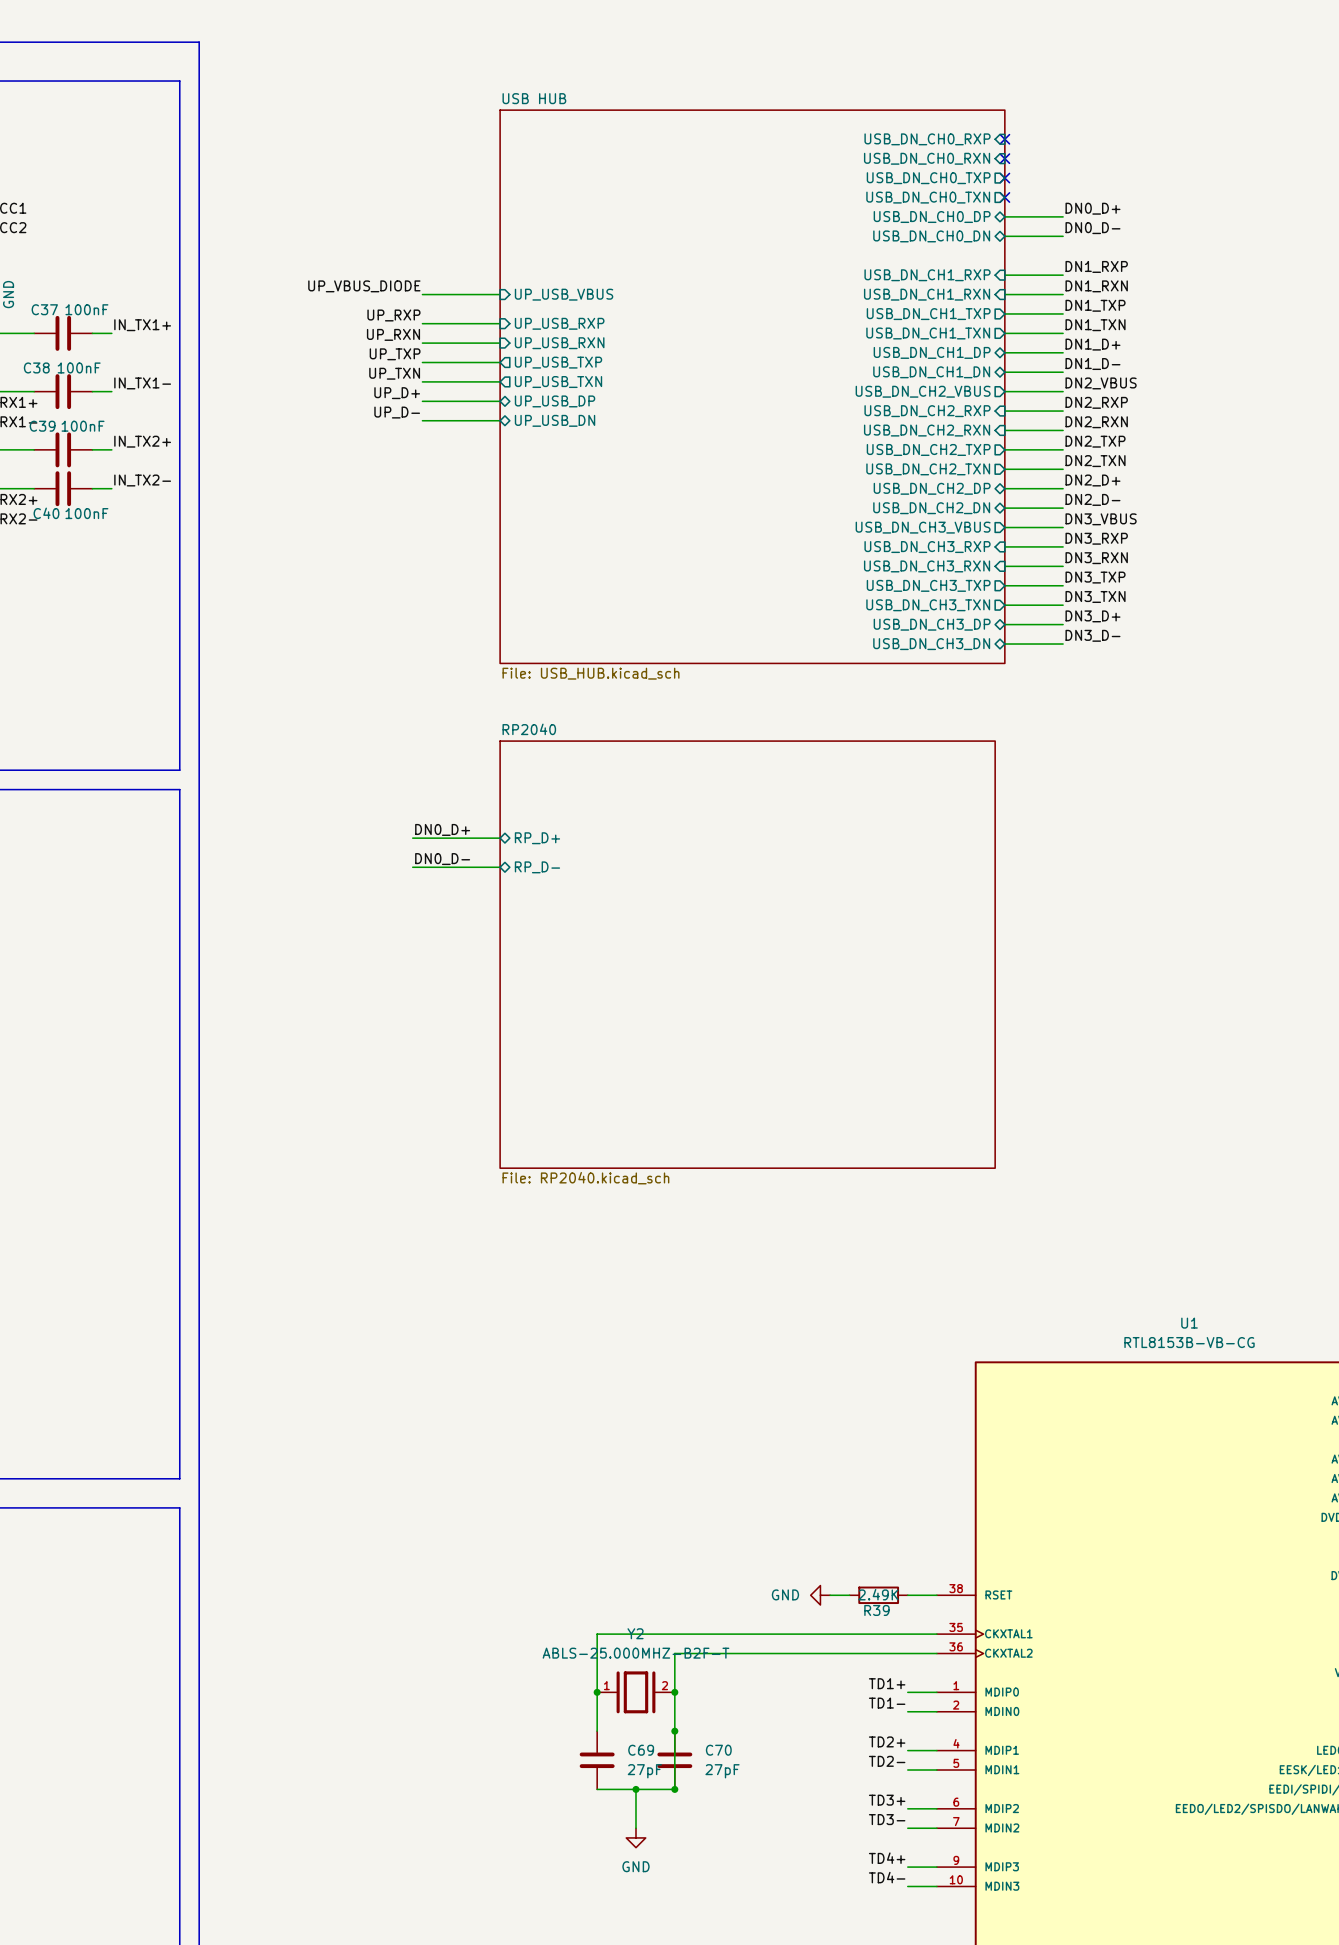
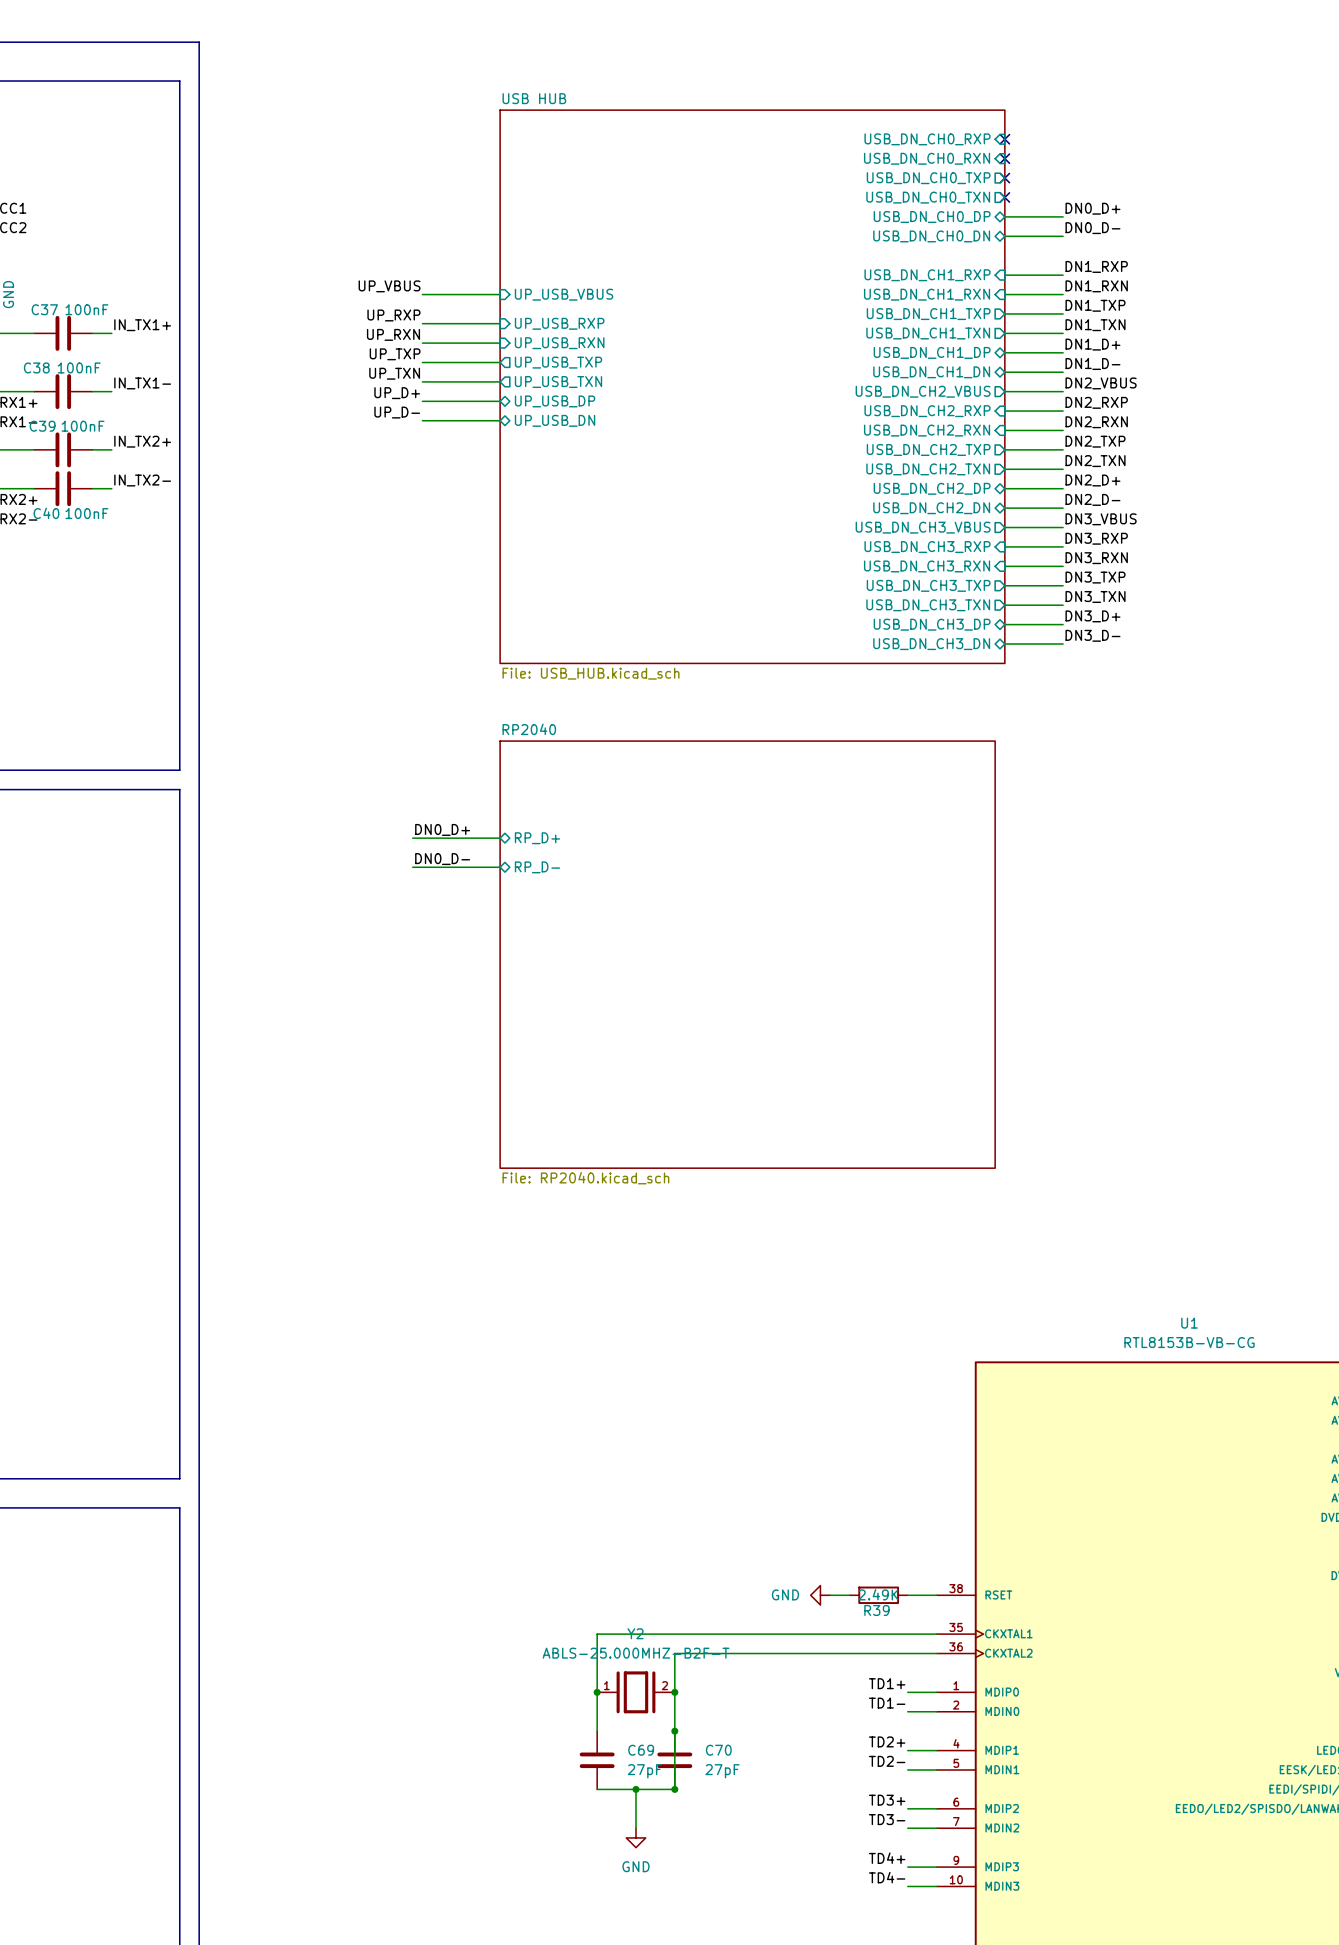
label: UP_VBUS_DIODE (364, 286) -> UP_VBUS (389, 286)

